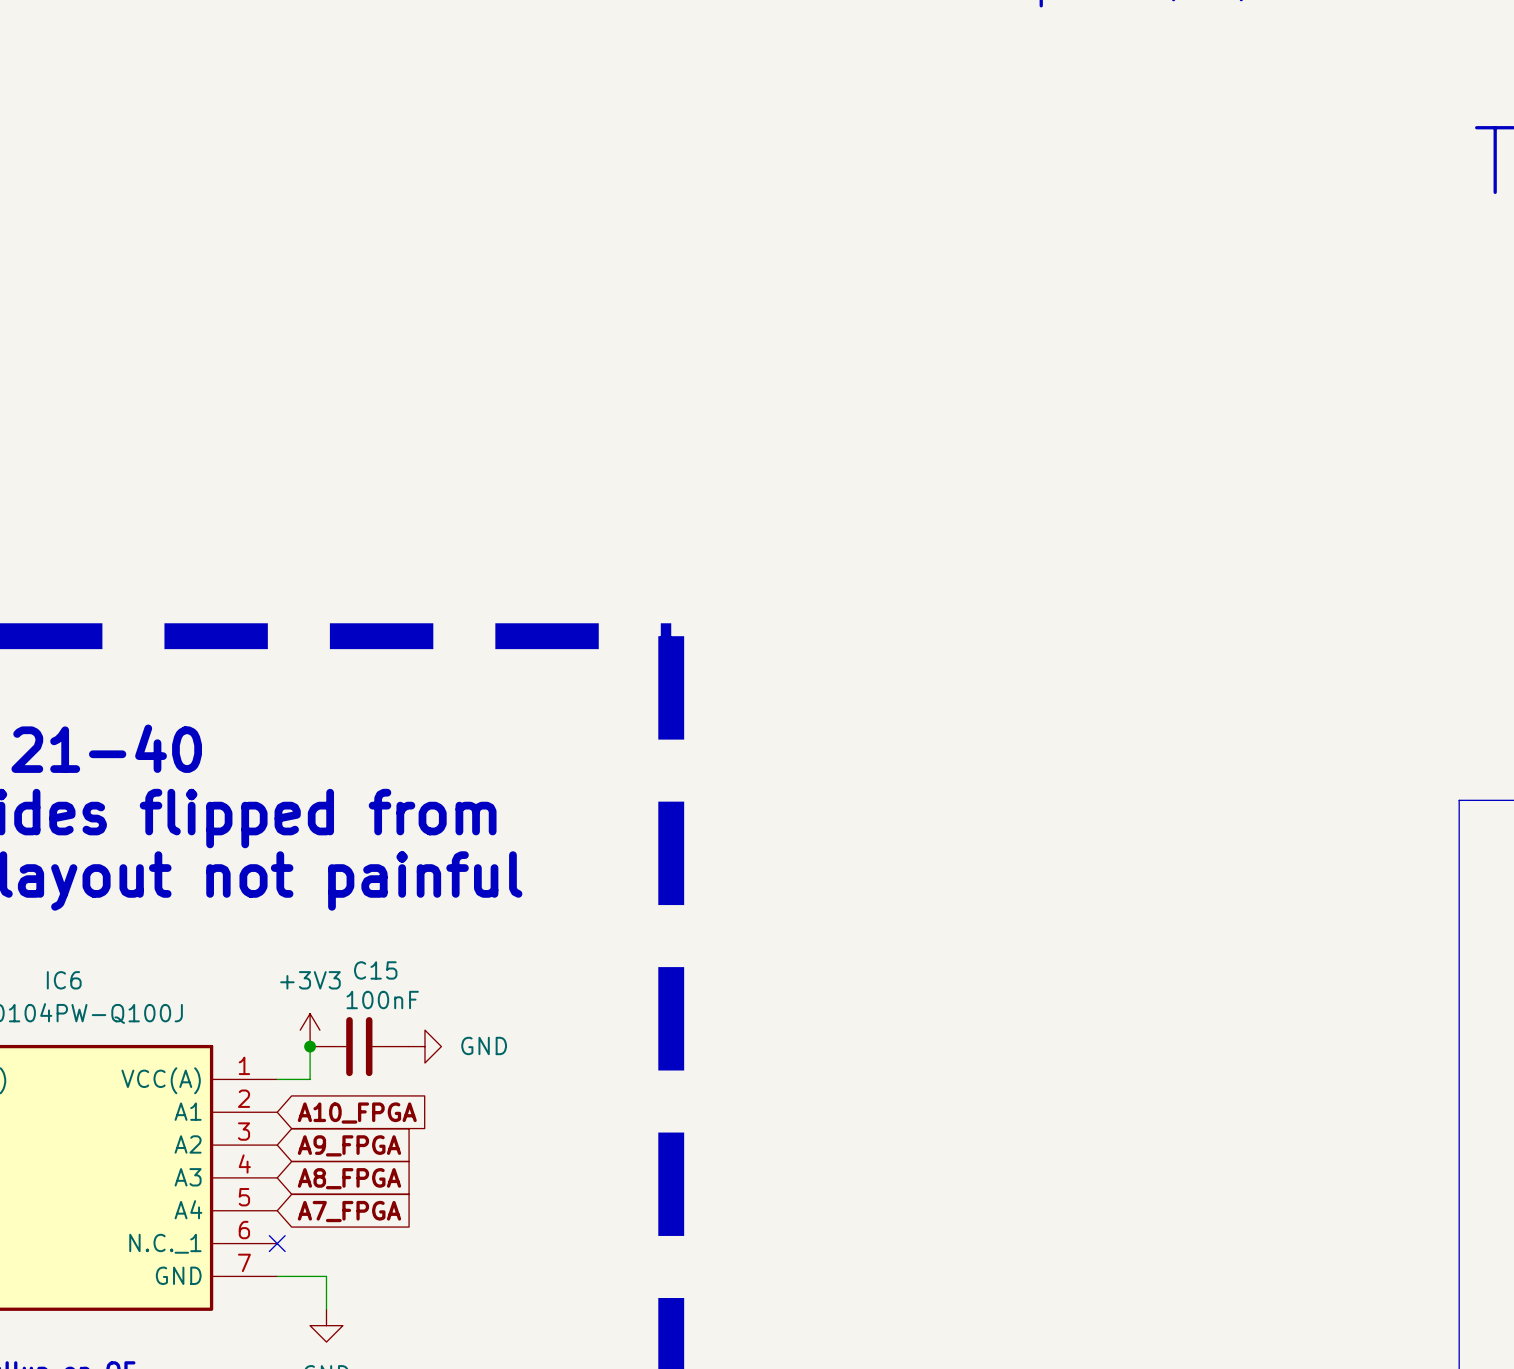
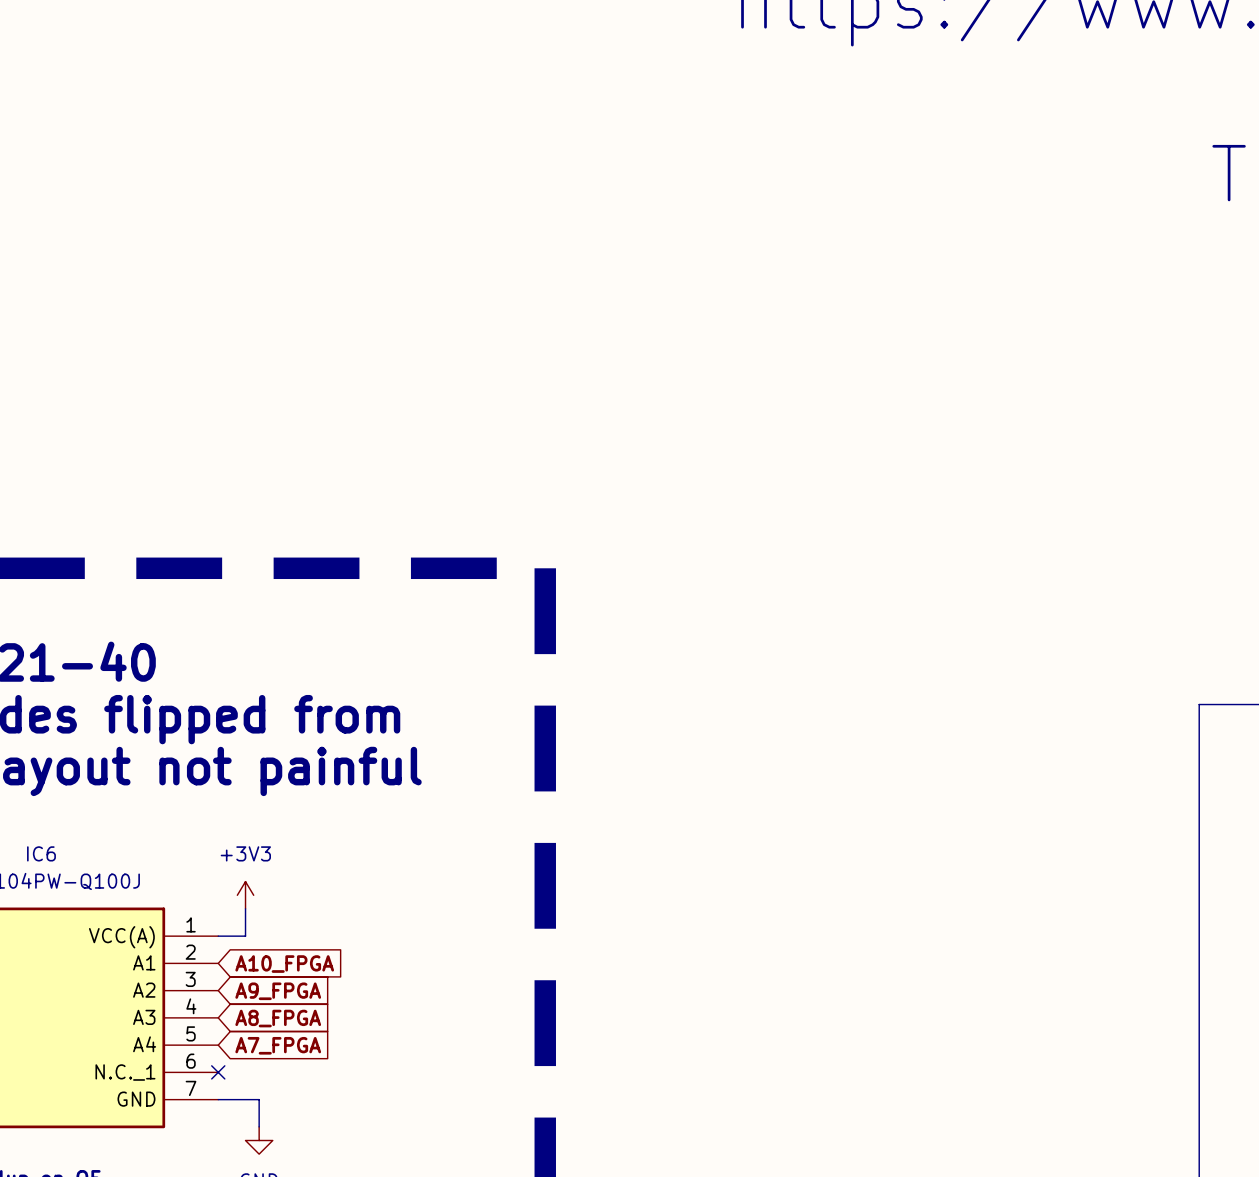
junction: (310, 1046) -> none
C15: 100nF (359, 1046) -> none
power symbol: GND (424, 1046) -> none

